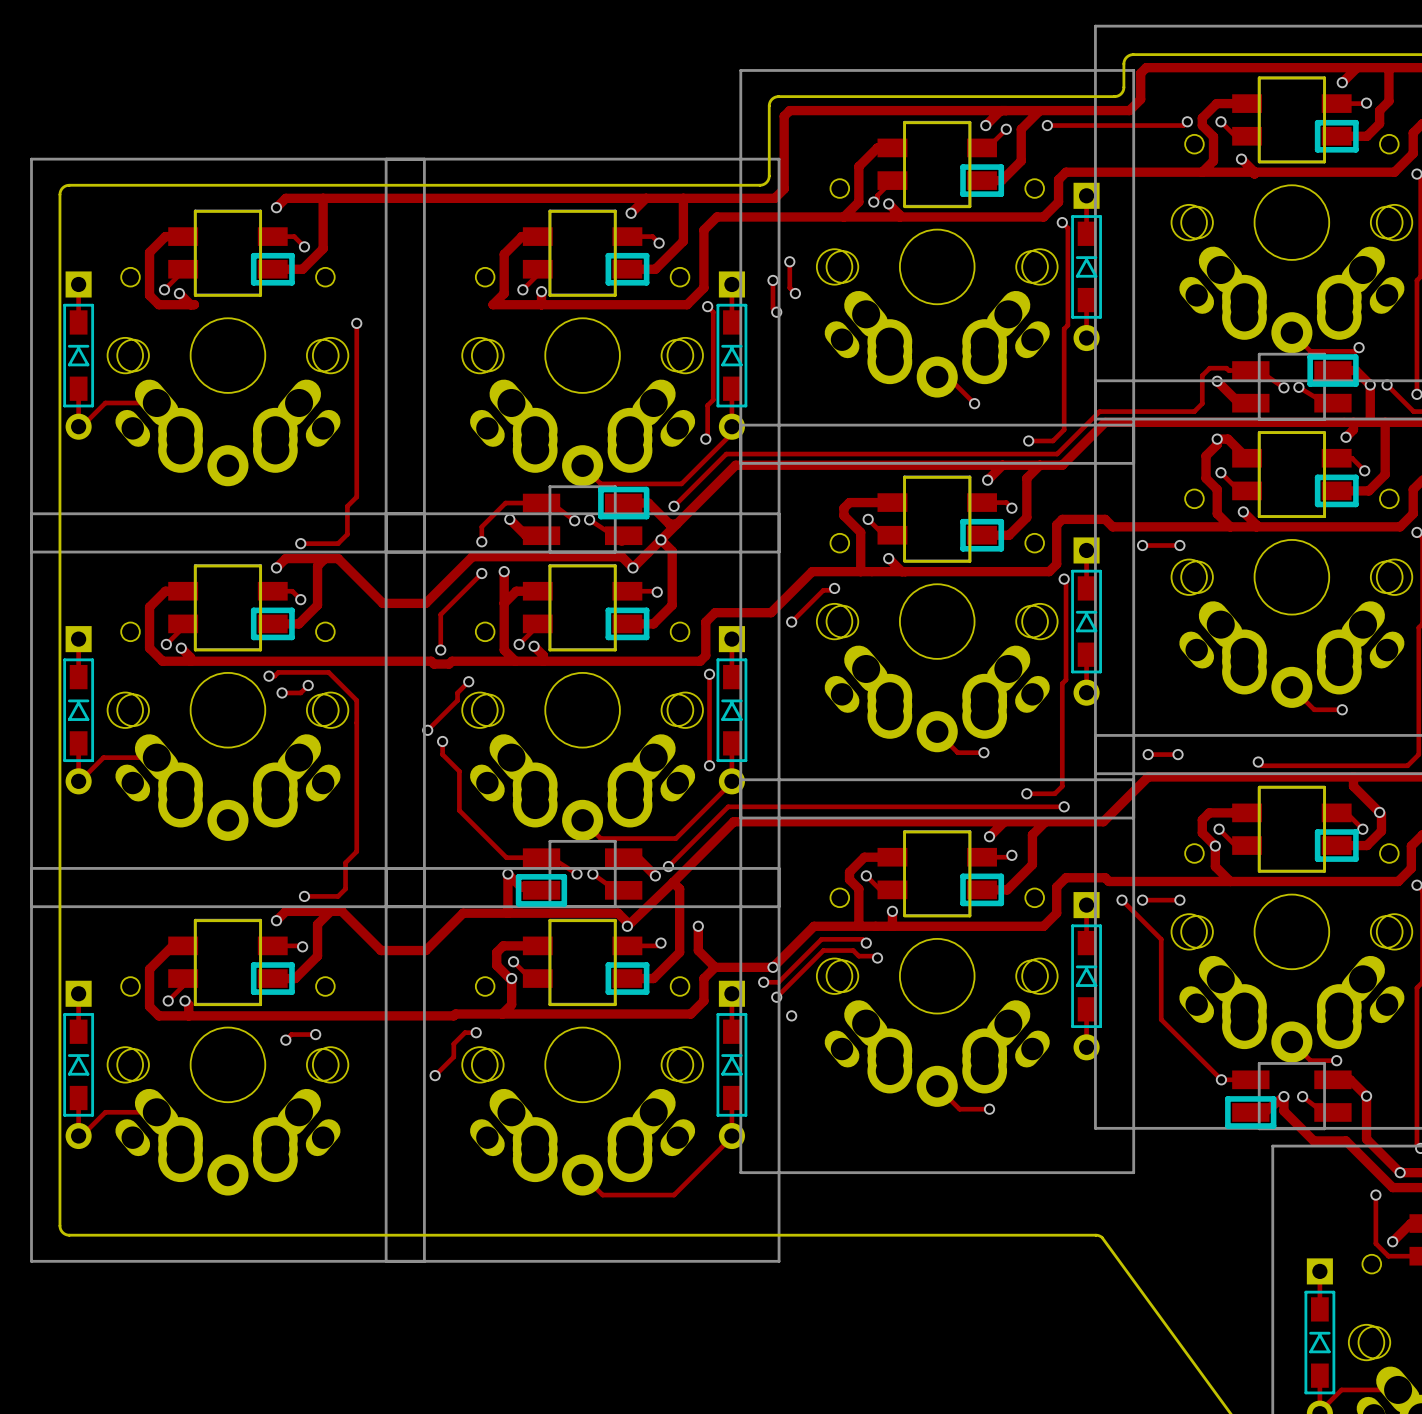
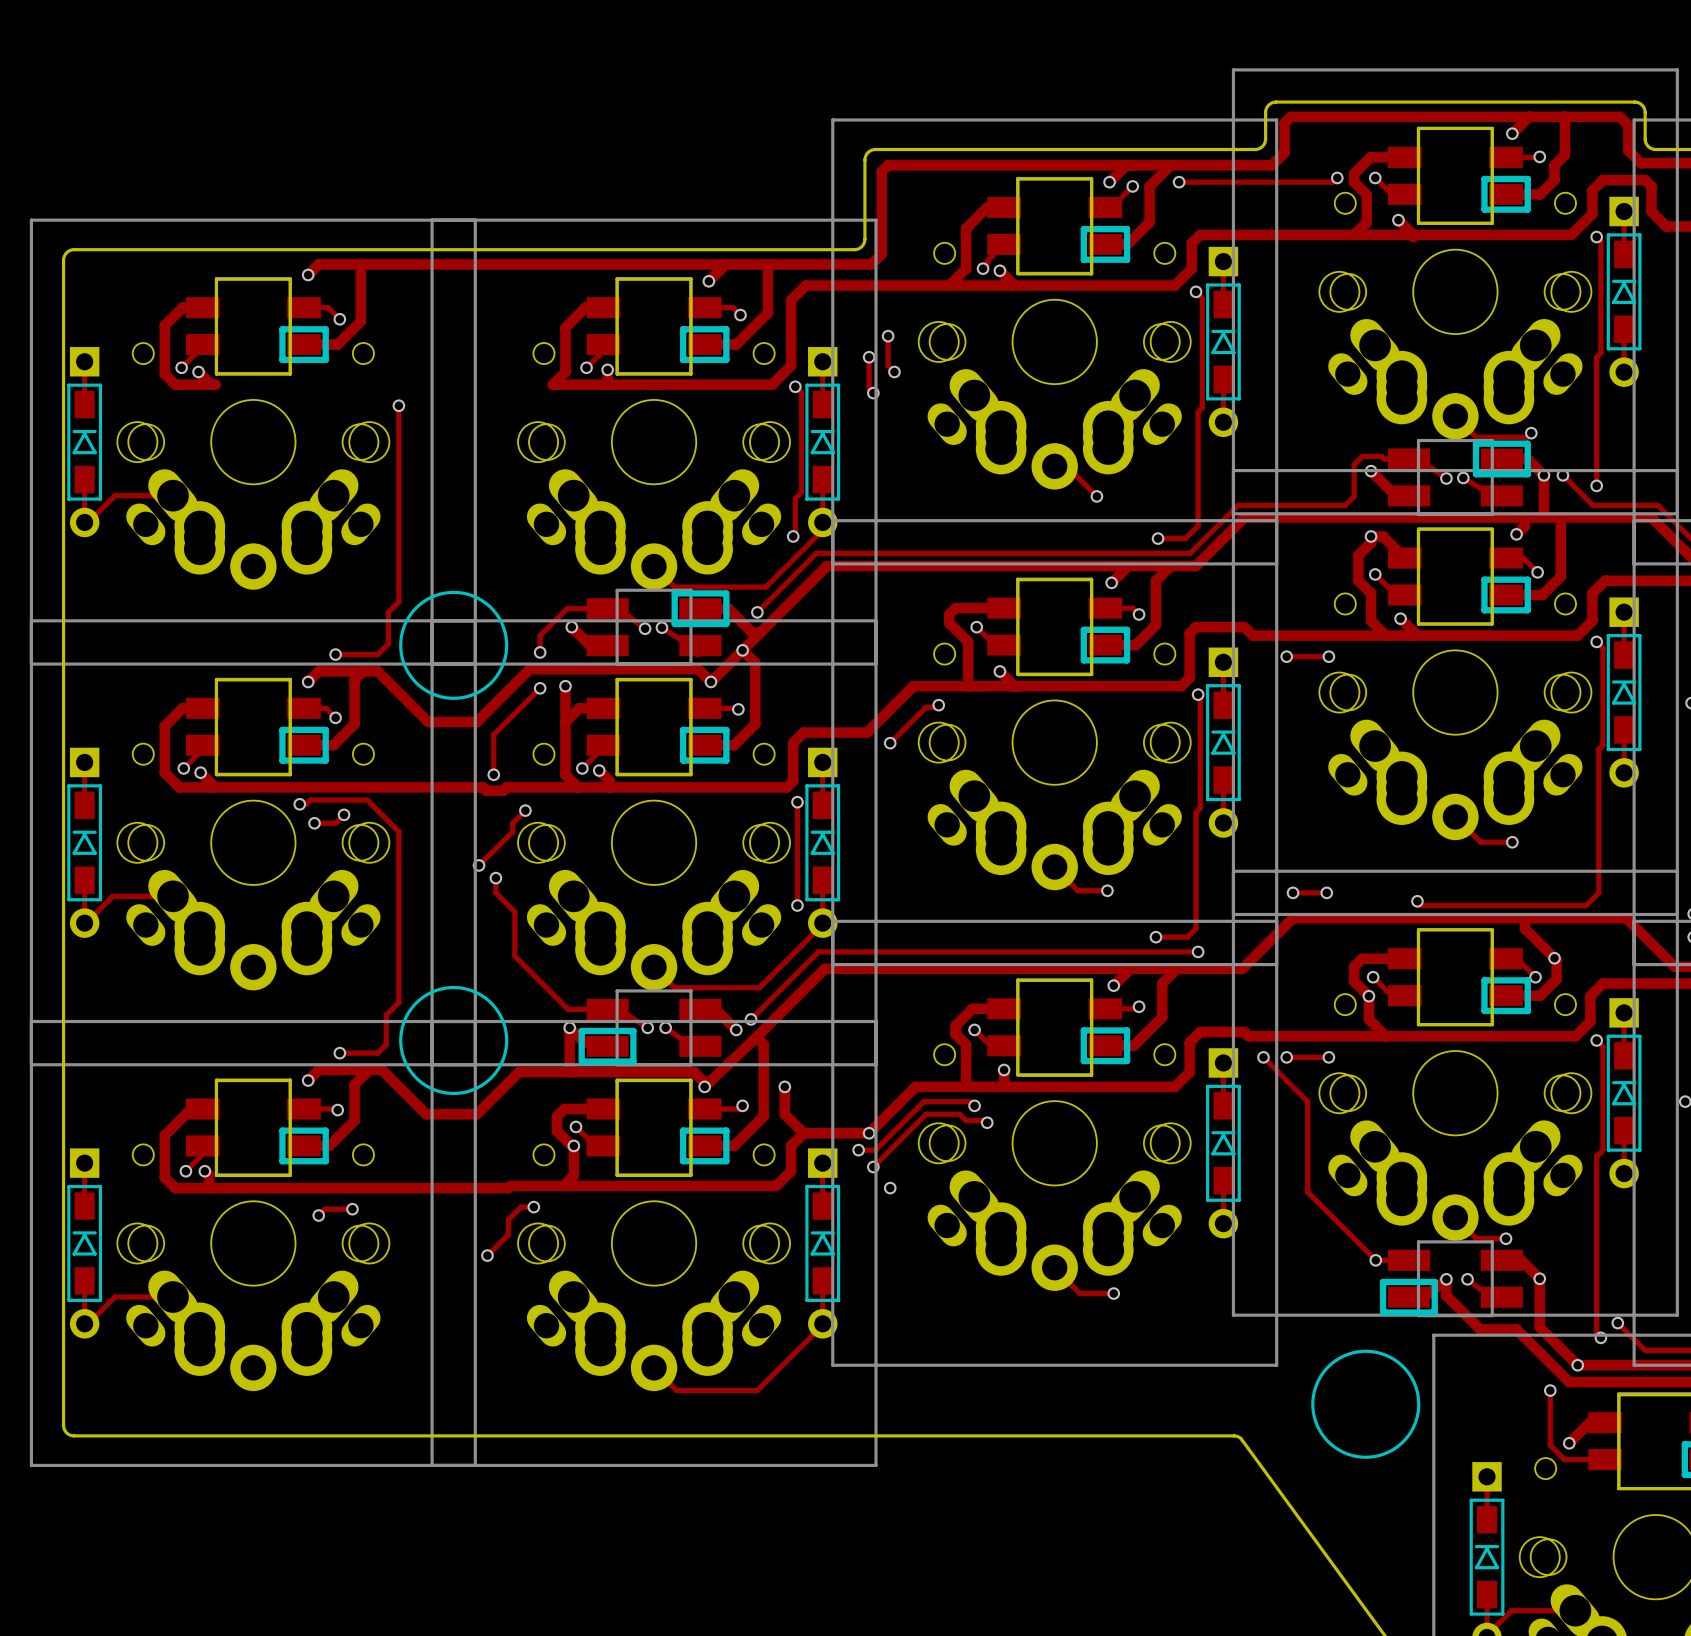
drawing: none -> [399, 590, 509, 700]
drawing: none -> [399, 985, 509, 1096]
drawing: none -> [1311, 1349, 1421, 1459]

